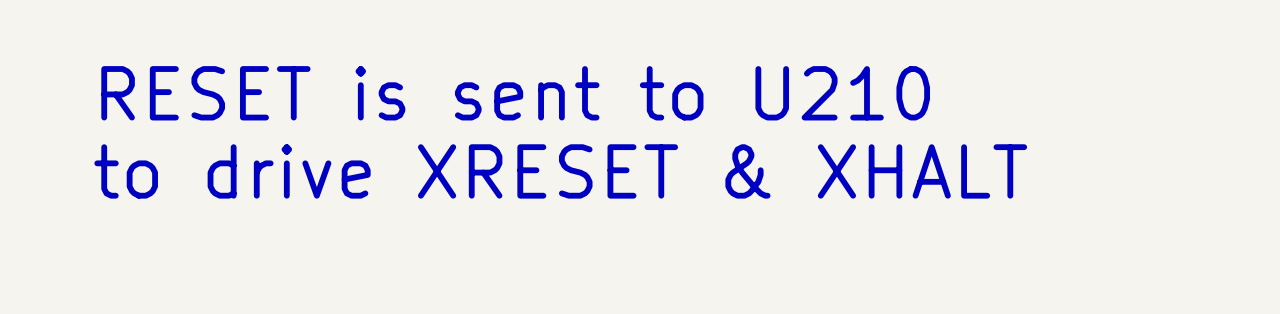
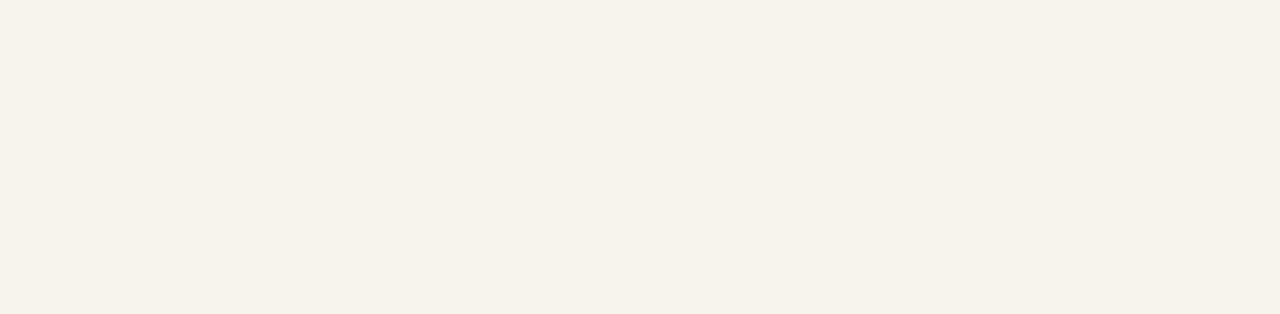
text: RESET is sent to U210 (515, 93) -> none
text: to drive XRESET & XHALT (560, 171) -> none

